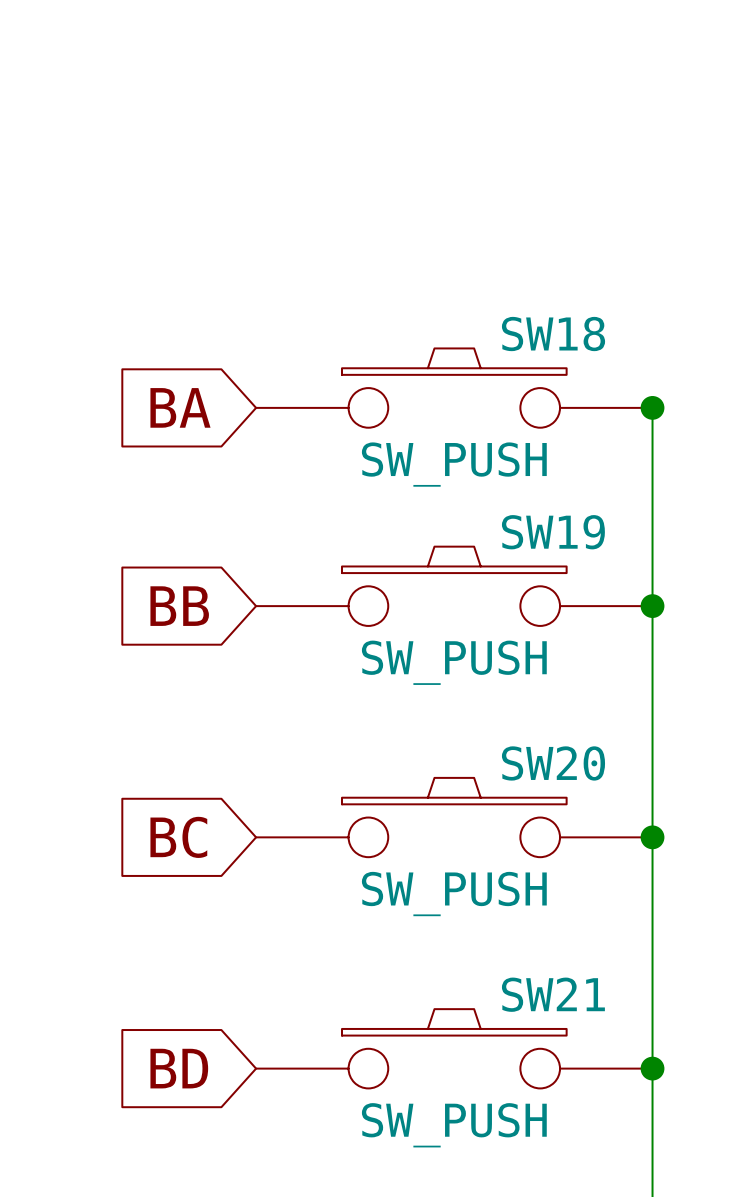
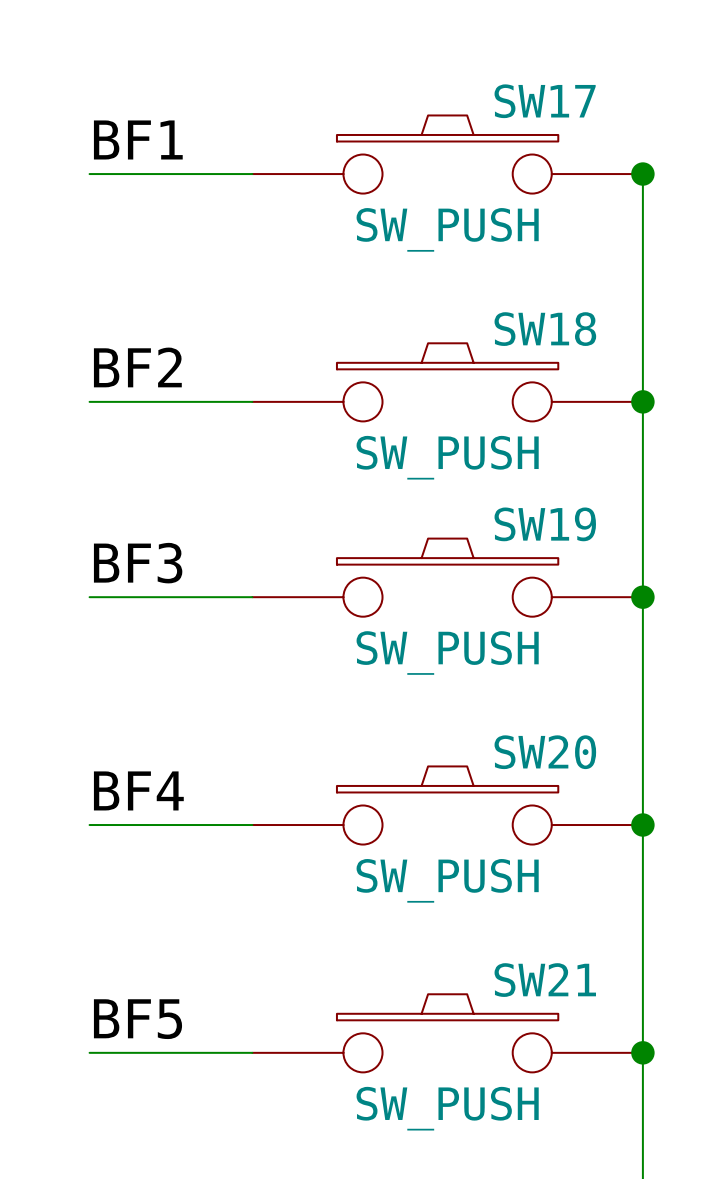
label: none -> BF1 (138, 139)
SW17: none -> SW_PUSH (447, 154)
wire: none -> (89, 174) (252, 174)
wire: none -> (642, 174) (642, 401)
junction: none -> (642, 174)
label: none -> BF2 (137, 367)
wire: none -> (89, 401) (252, 401)
global label: BA (180, 407) -> none
label: none -> BF3 (138, 563)
wire: none -> (89, 597) (252, 597)
global label: BB (179, 606) -> none
label: none -> BF4 (138, 790)
wire: none -> (89, 825) (252, 825)
global label: BC (178, 837) -> none
label: none -> BF5 (137, 1019)
wire: none -> (89, 1052) (252, 1052)
global label: BD (179, 1068) -> none

